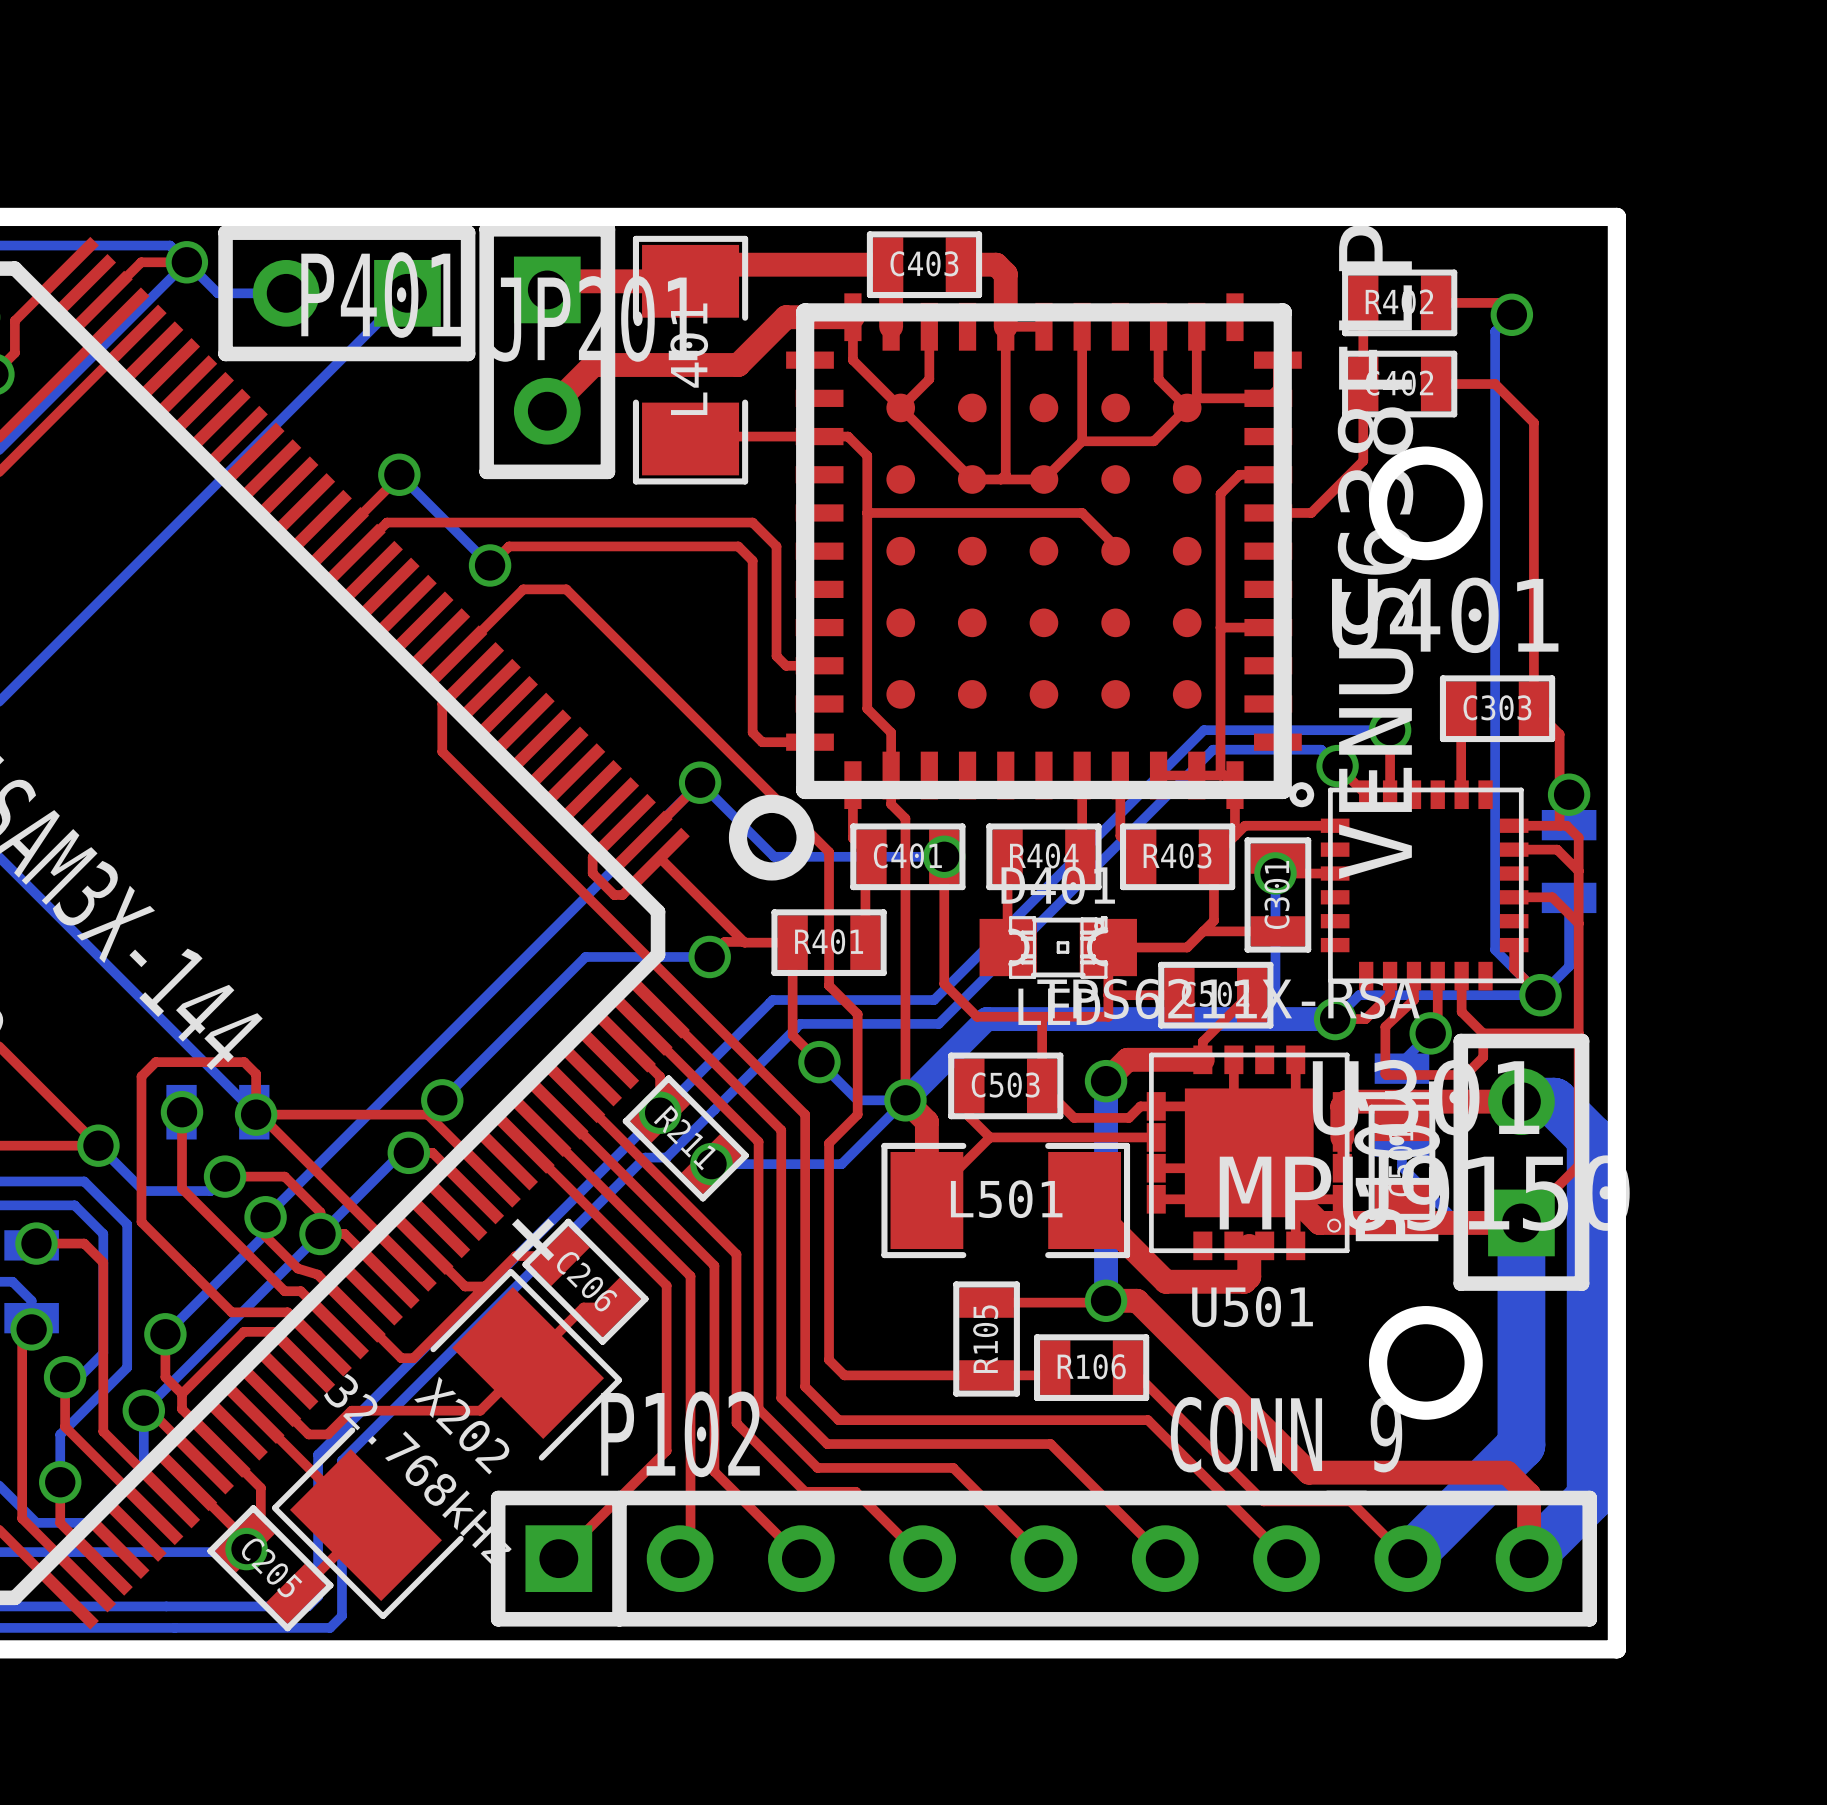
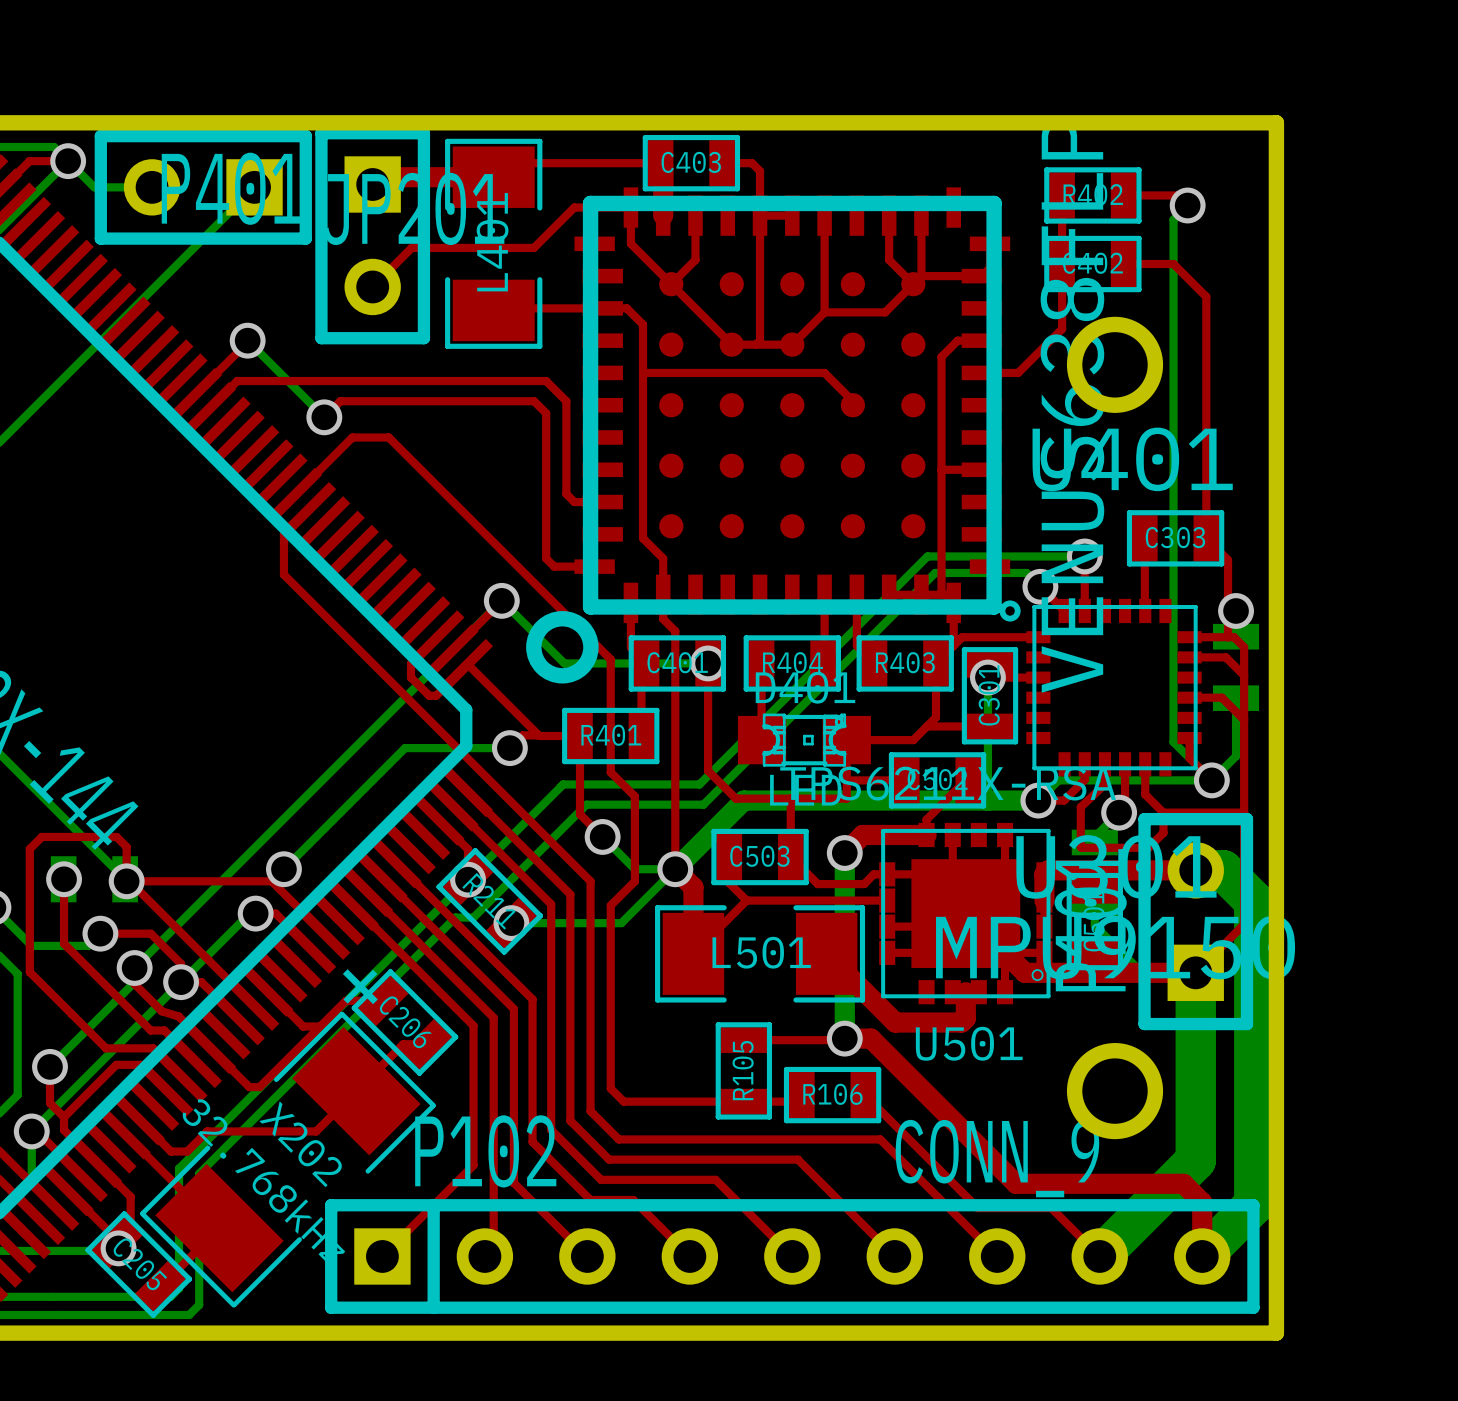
top track width: thick (707, 264) (888, 264) -> thin (507, 163) (660, 163)
top track width: thick (960, 264) (996, 264) (1005, 274) (1005, 326) -> thin (722, 163) (752, 163) (760, 171) (760, 215)
top track width: thick (852, 317) (785, 317) (738, 365) (593, 365) (547, 411) -> thin (630, 207) (574, 207) (533, 247) (411, 247) (372, 286)

